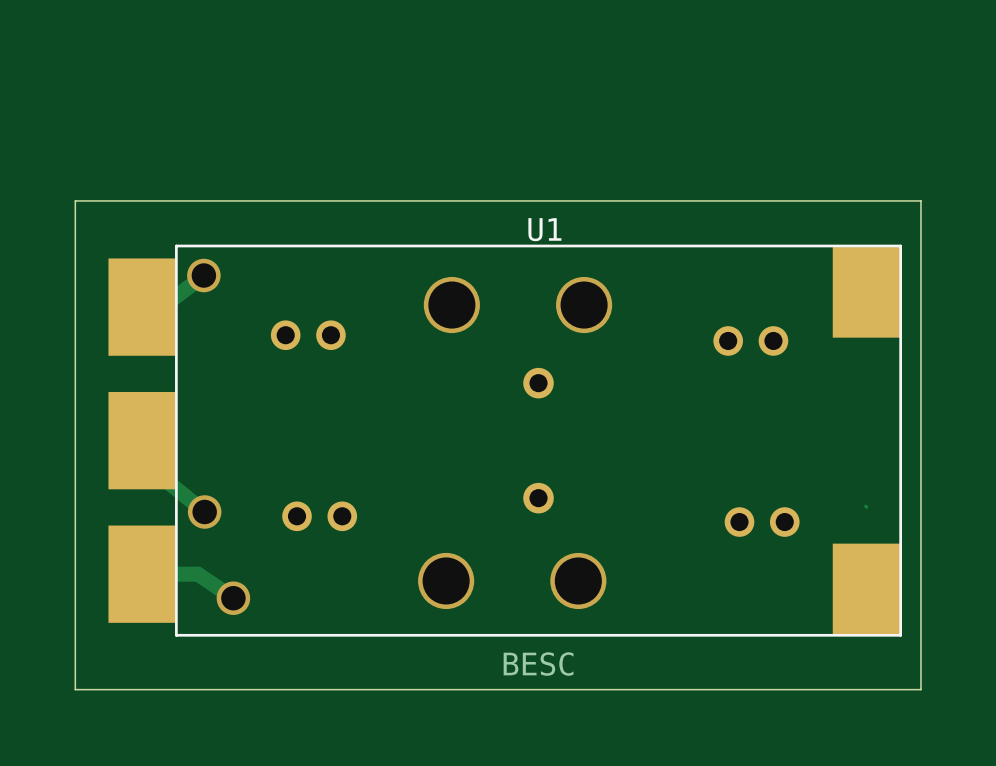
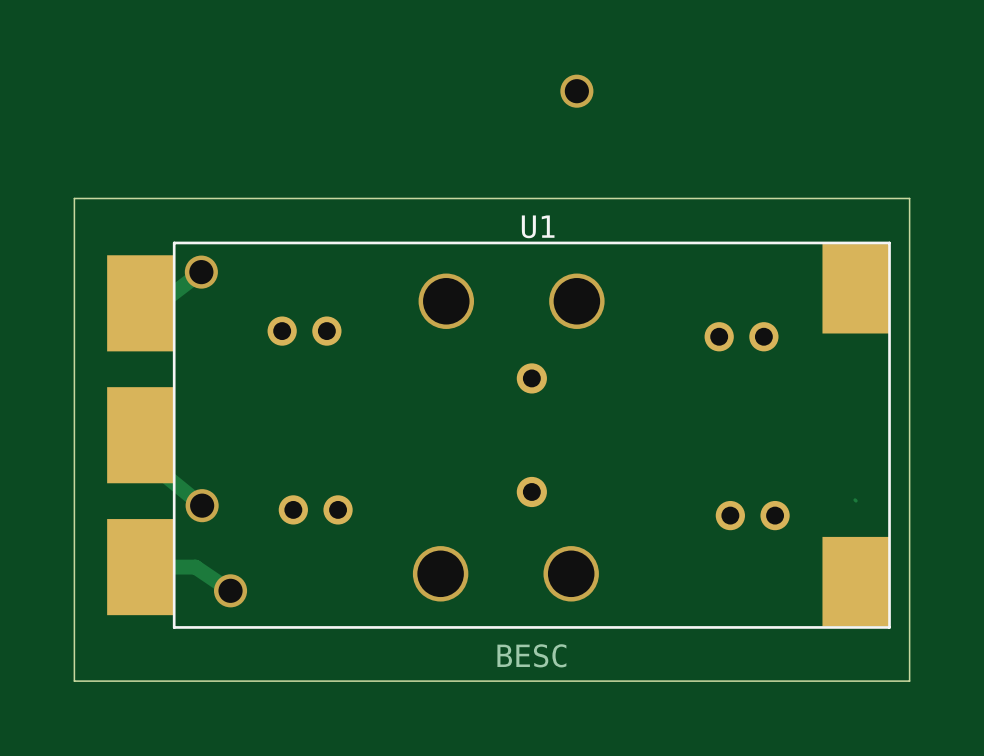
via: none -> (576, 91)

